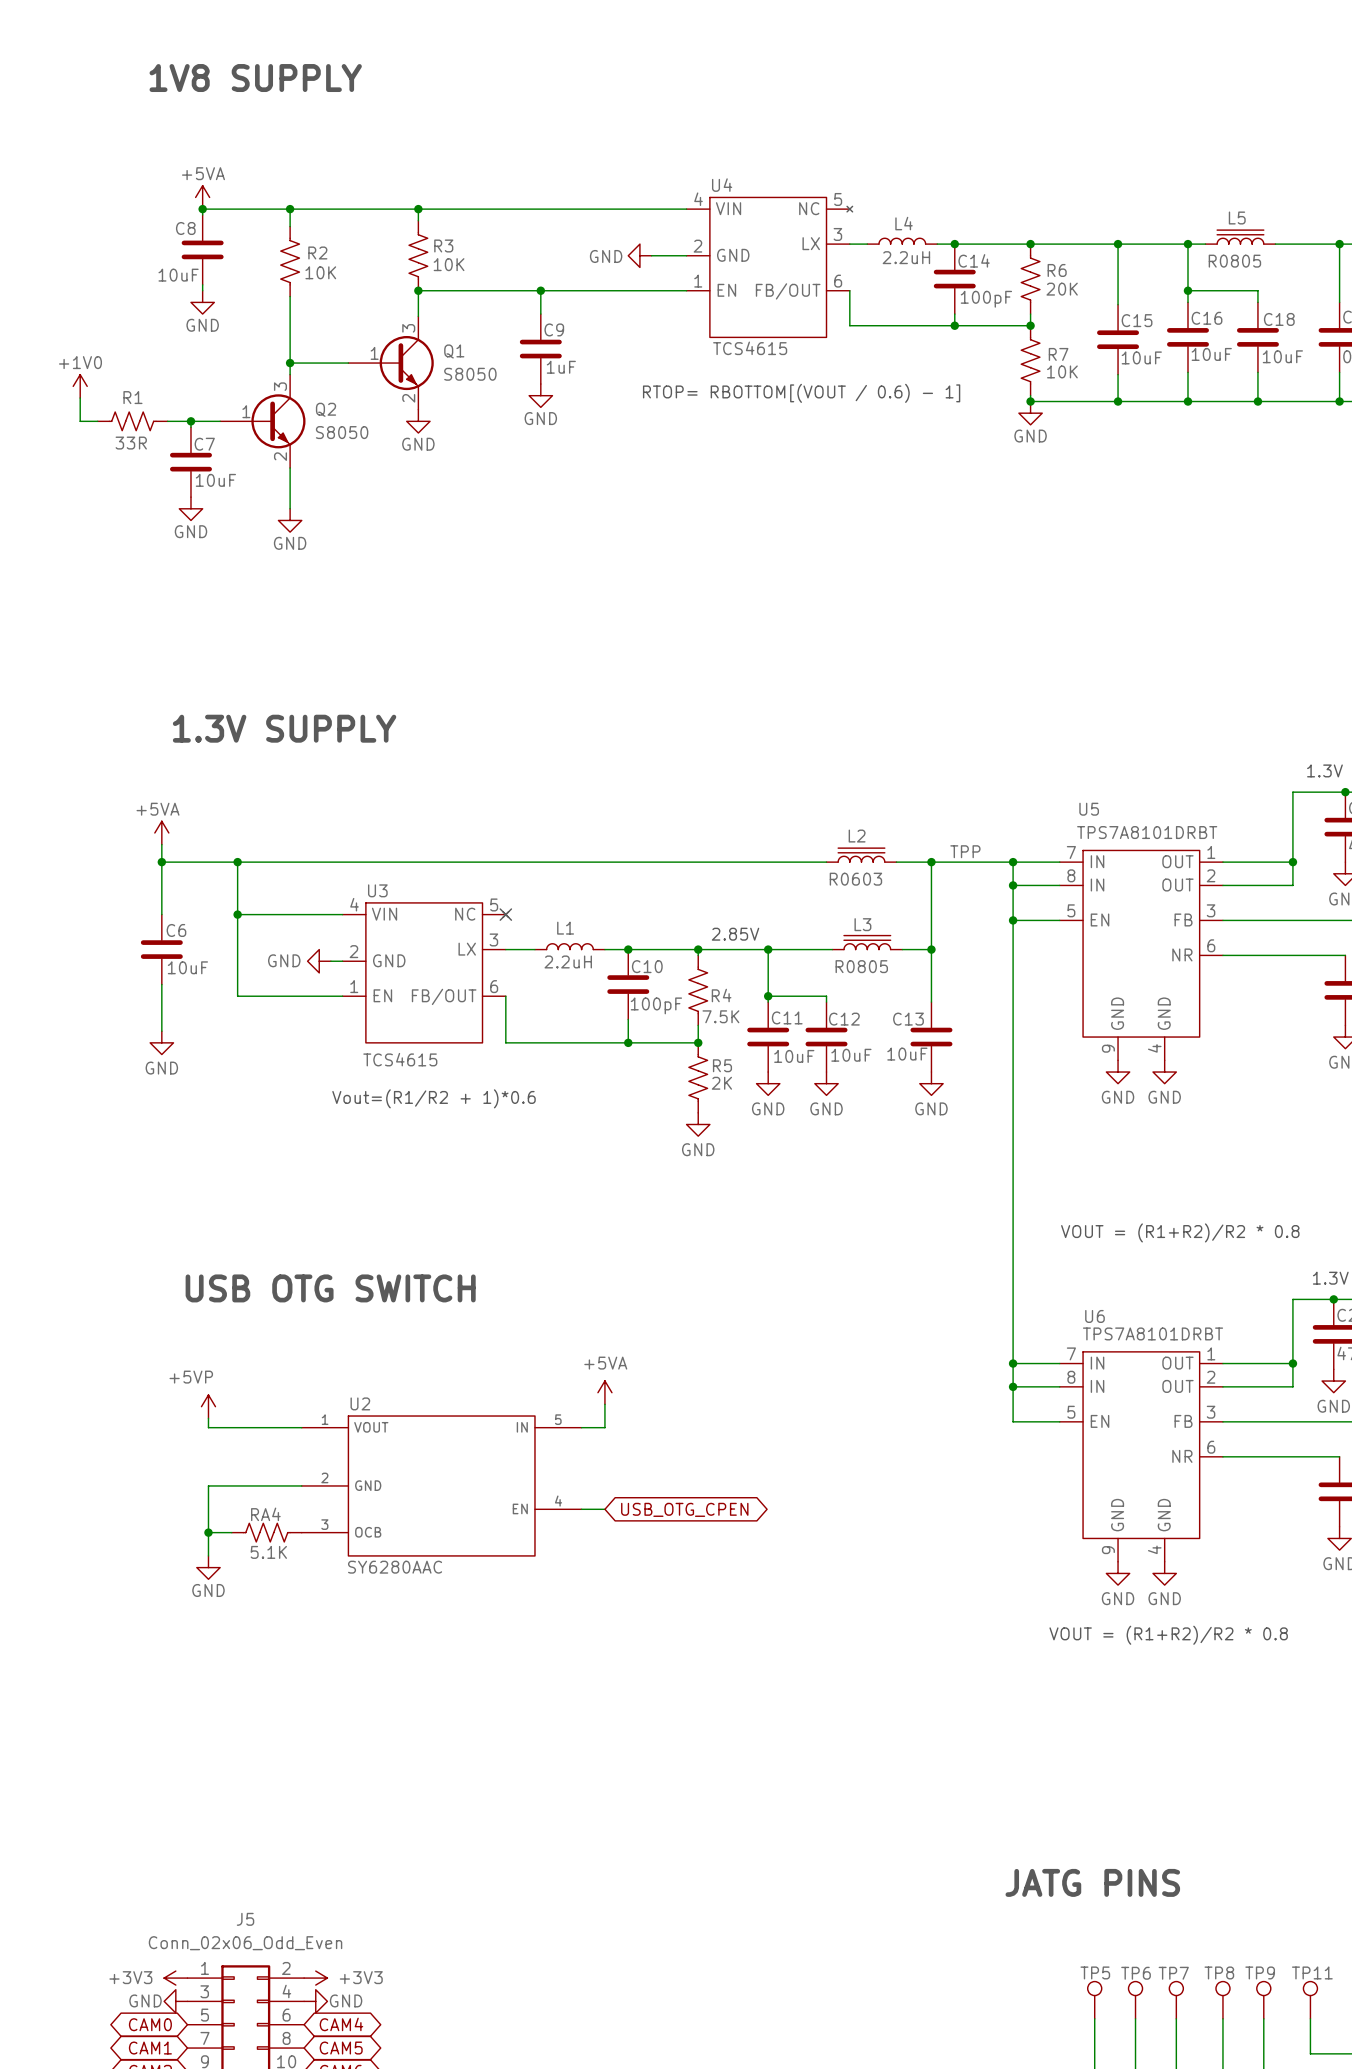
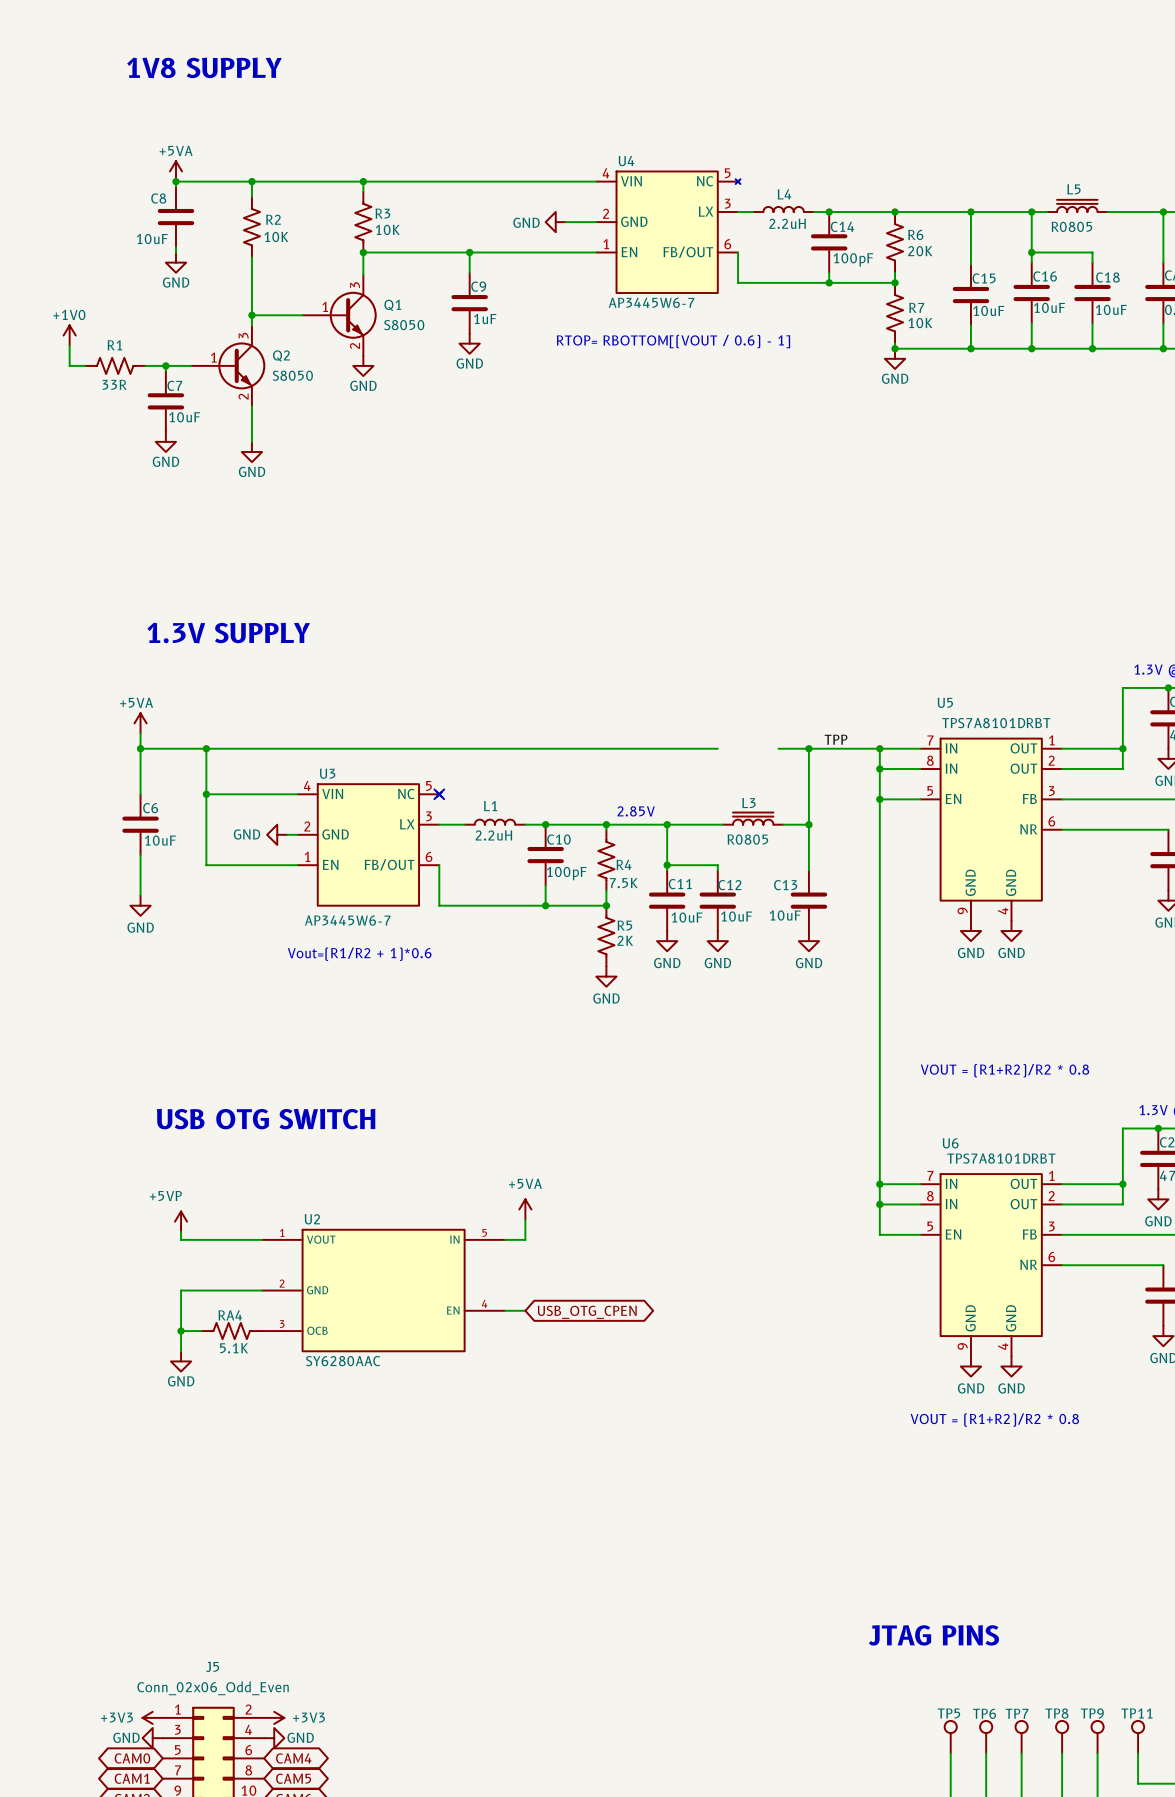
U4 value: TCS4615 (750, 348) -> AP3445W6-7 (651, 302)
L2: R0603 (861, 855) -> none
U3 value: TCS4615 (400, 1059) -> AP3445W6-7 (347, 920)
text: JATG PINS (1092, 1882) -> JTAG PINS (933, 1635)

